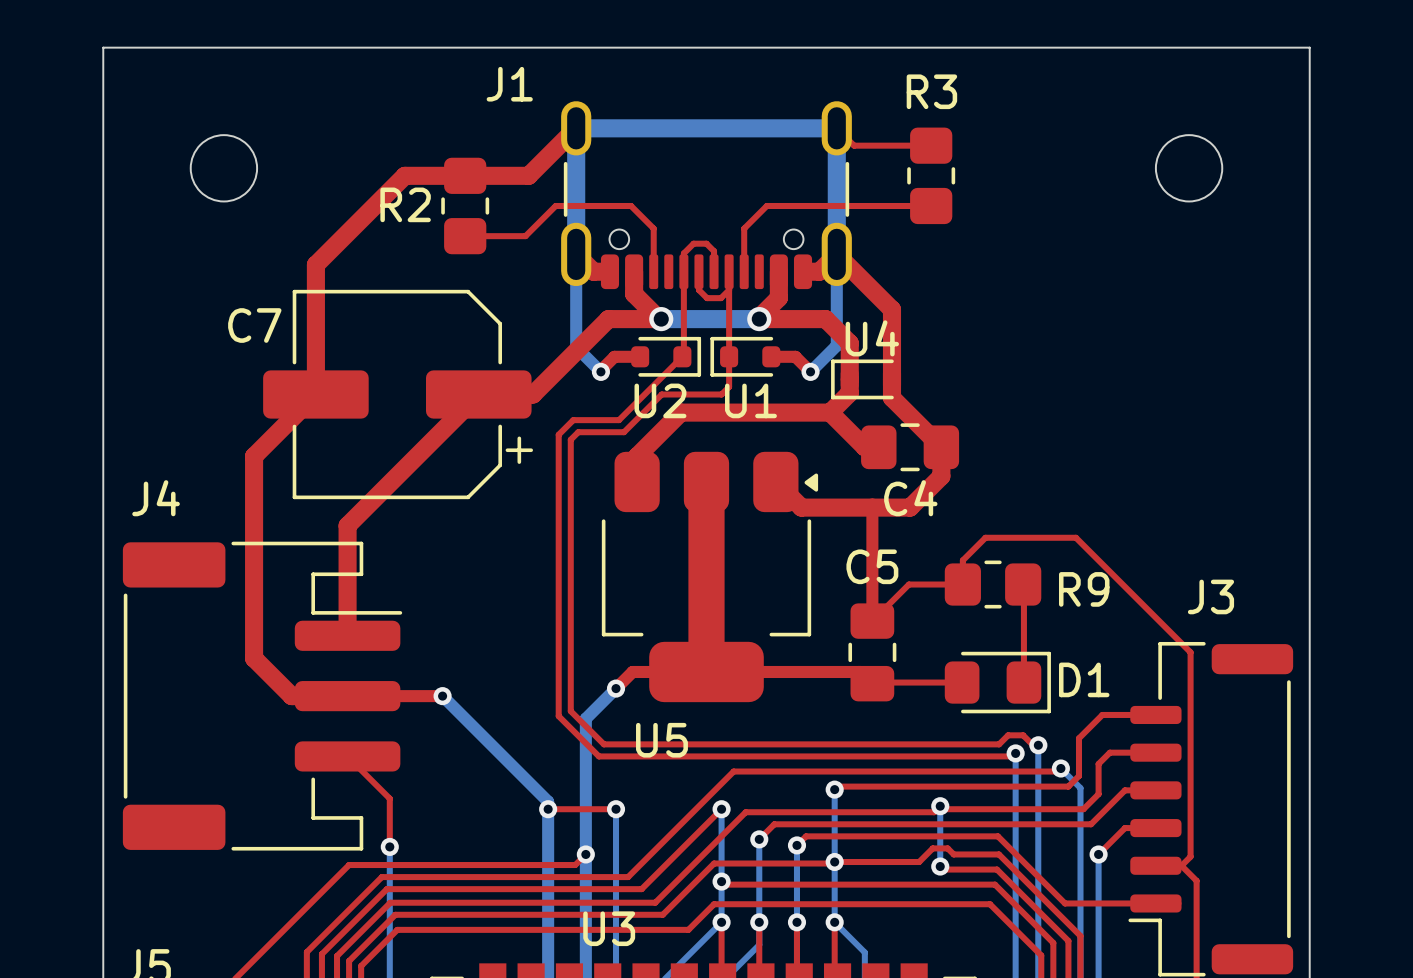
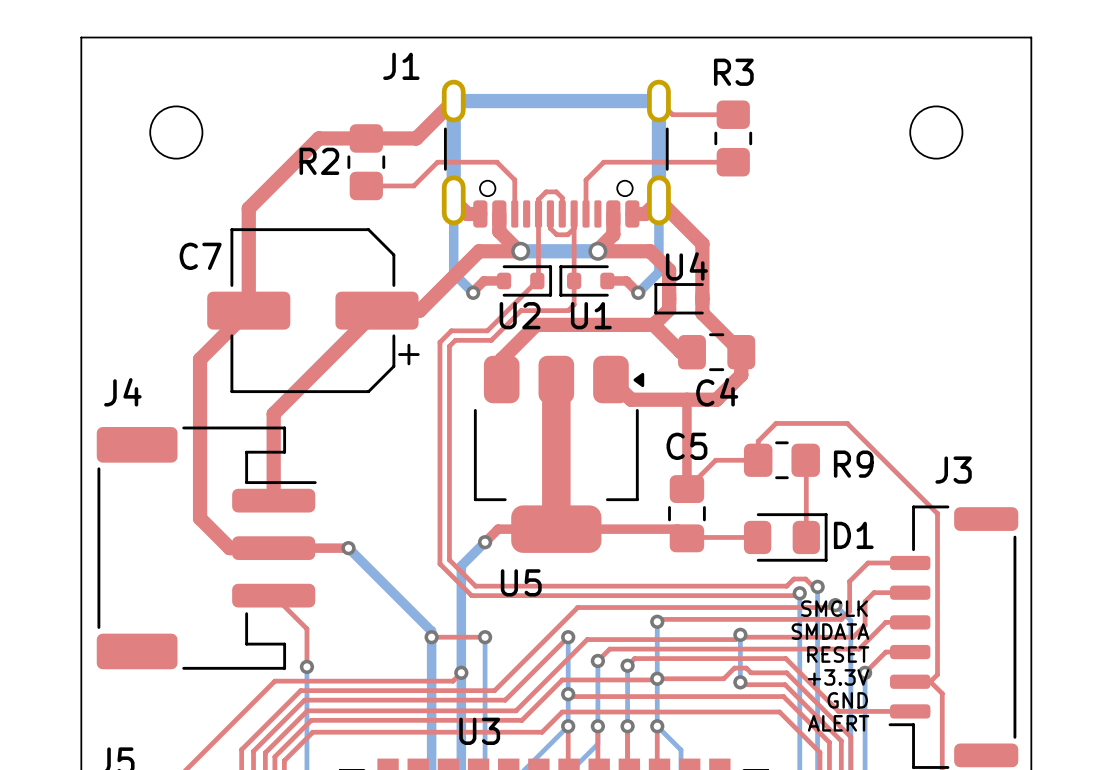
text: none -> SMCLK (834, 608)
text: none -> SMDATA (830, 631)
text: none -> RESET (838, 654)
text: none -> +3.3V (838, 677)
text: none -> GND (847, 700)
text: none -> ALERT (838, 723)

